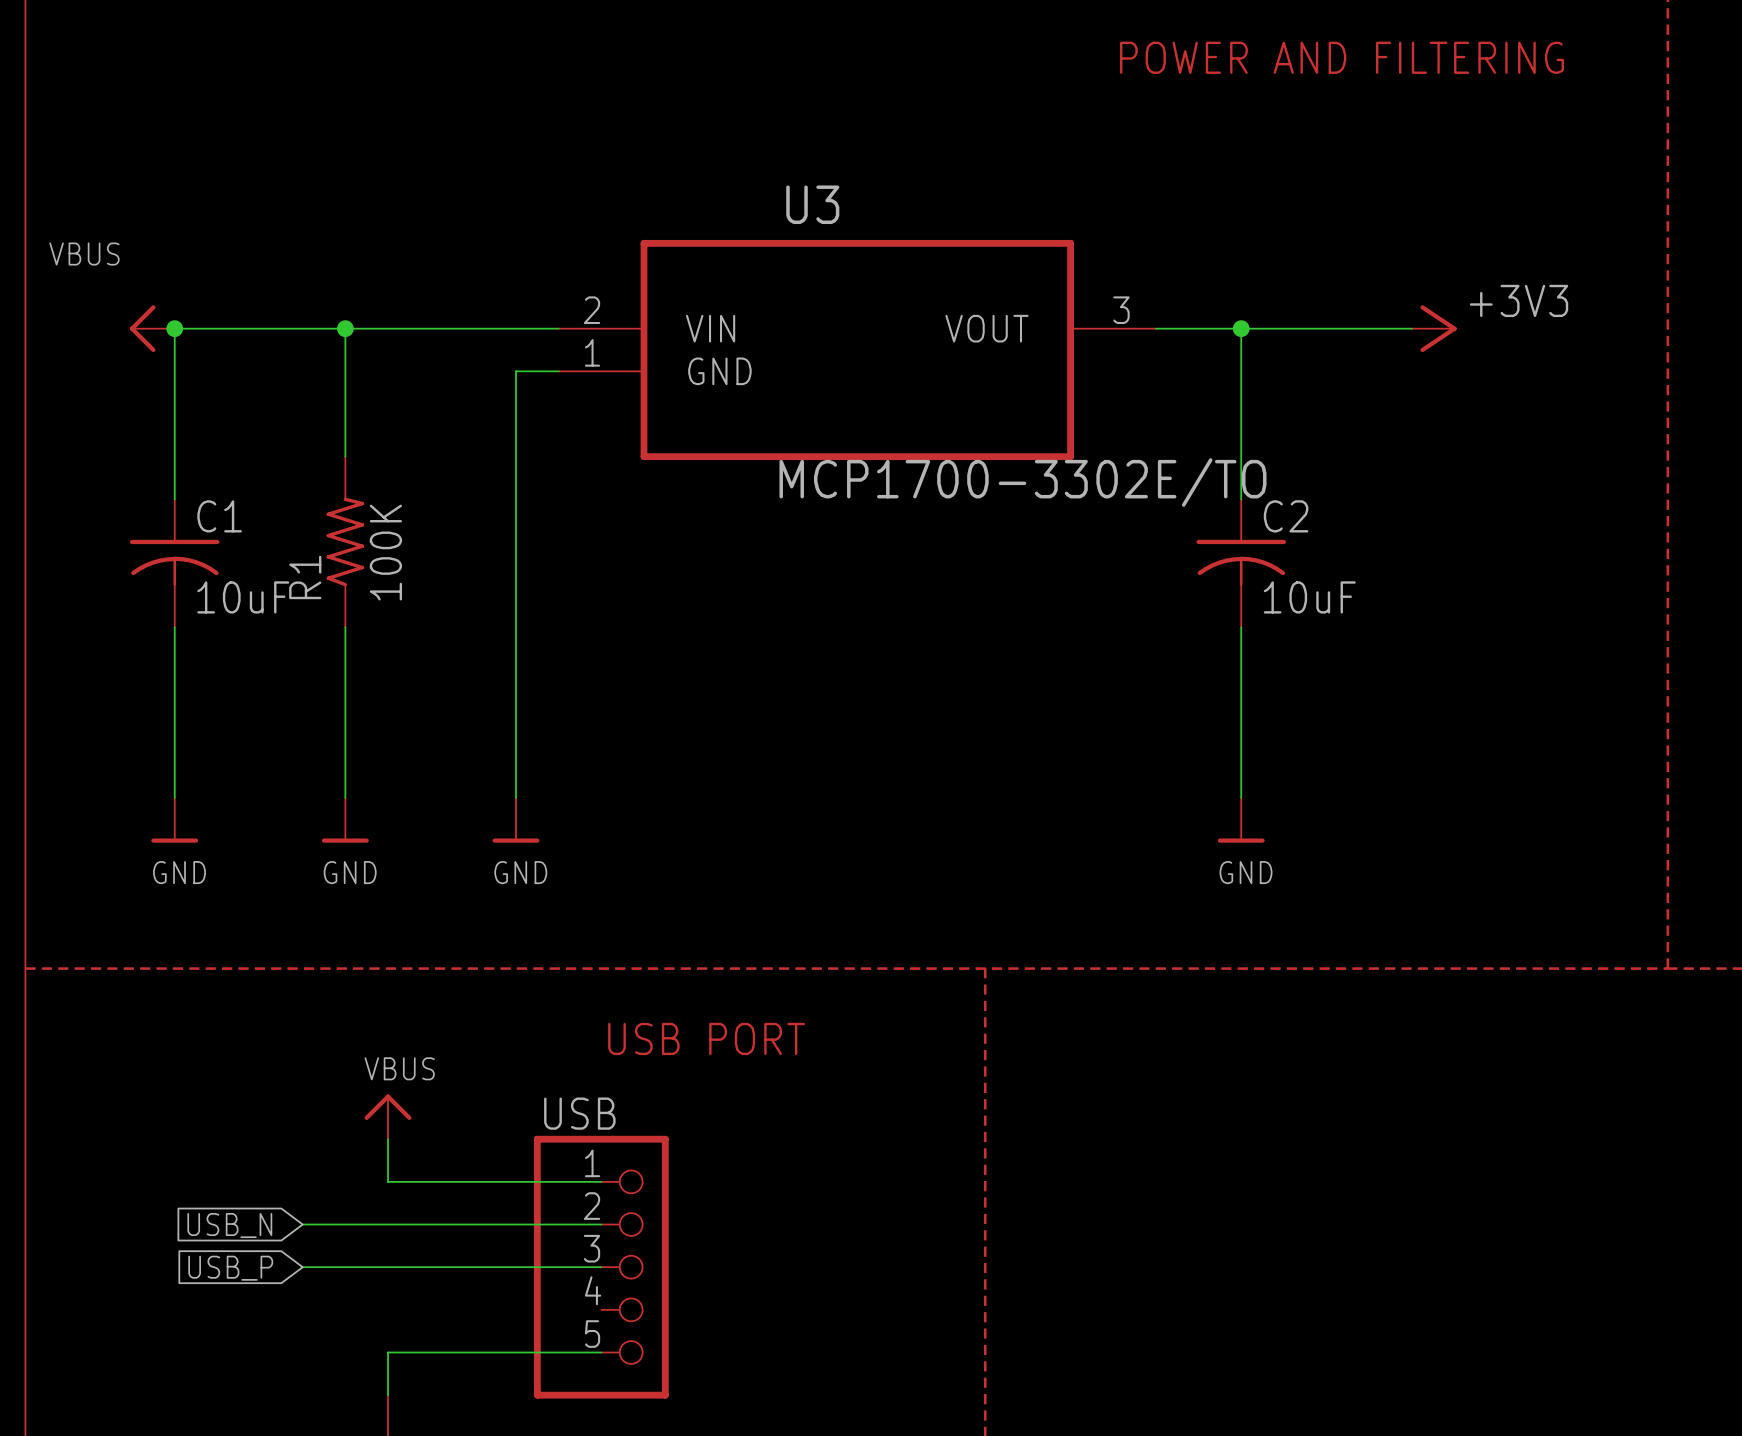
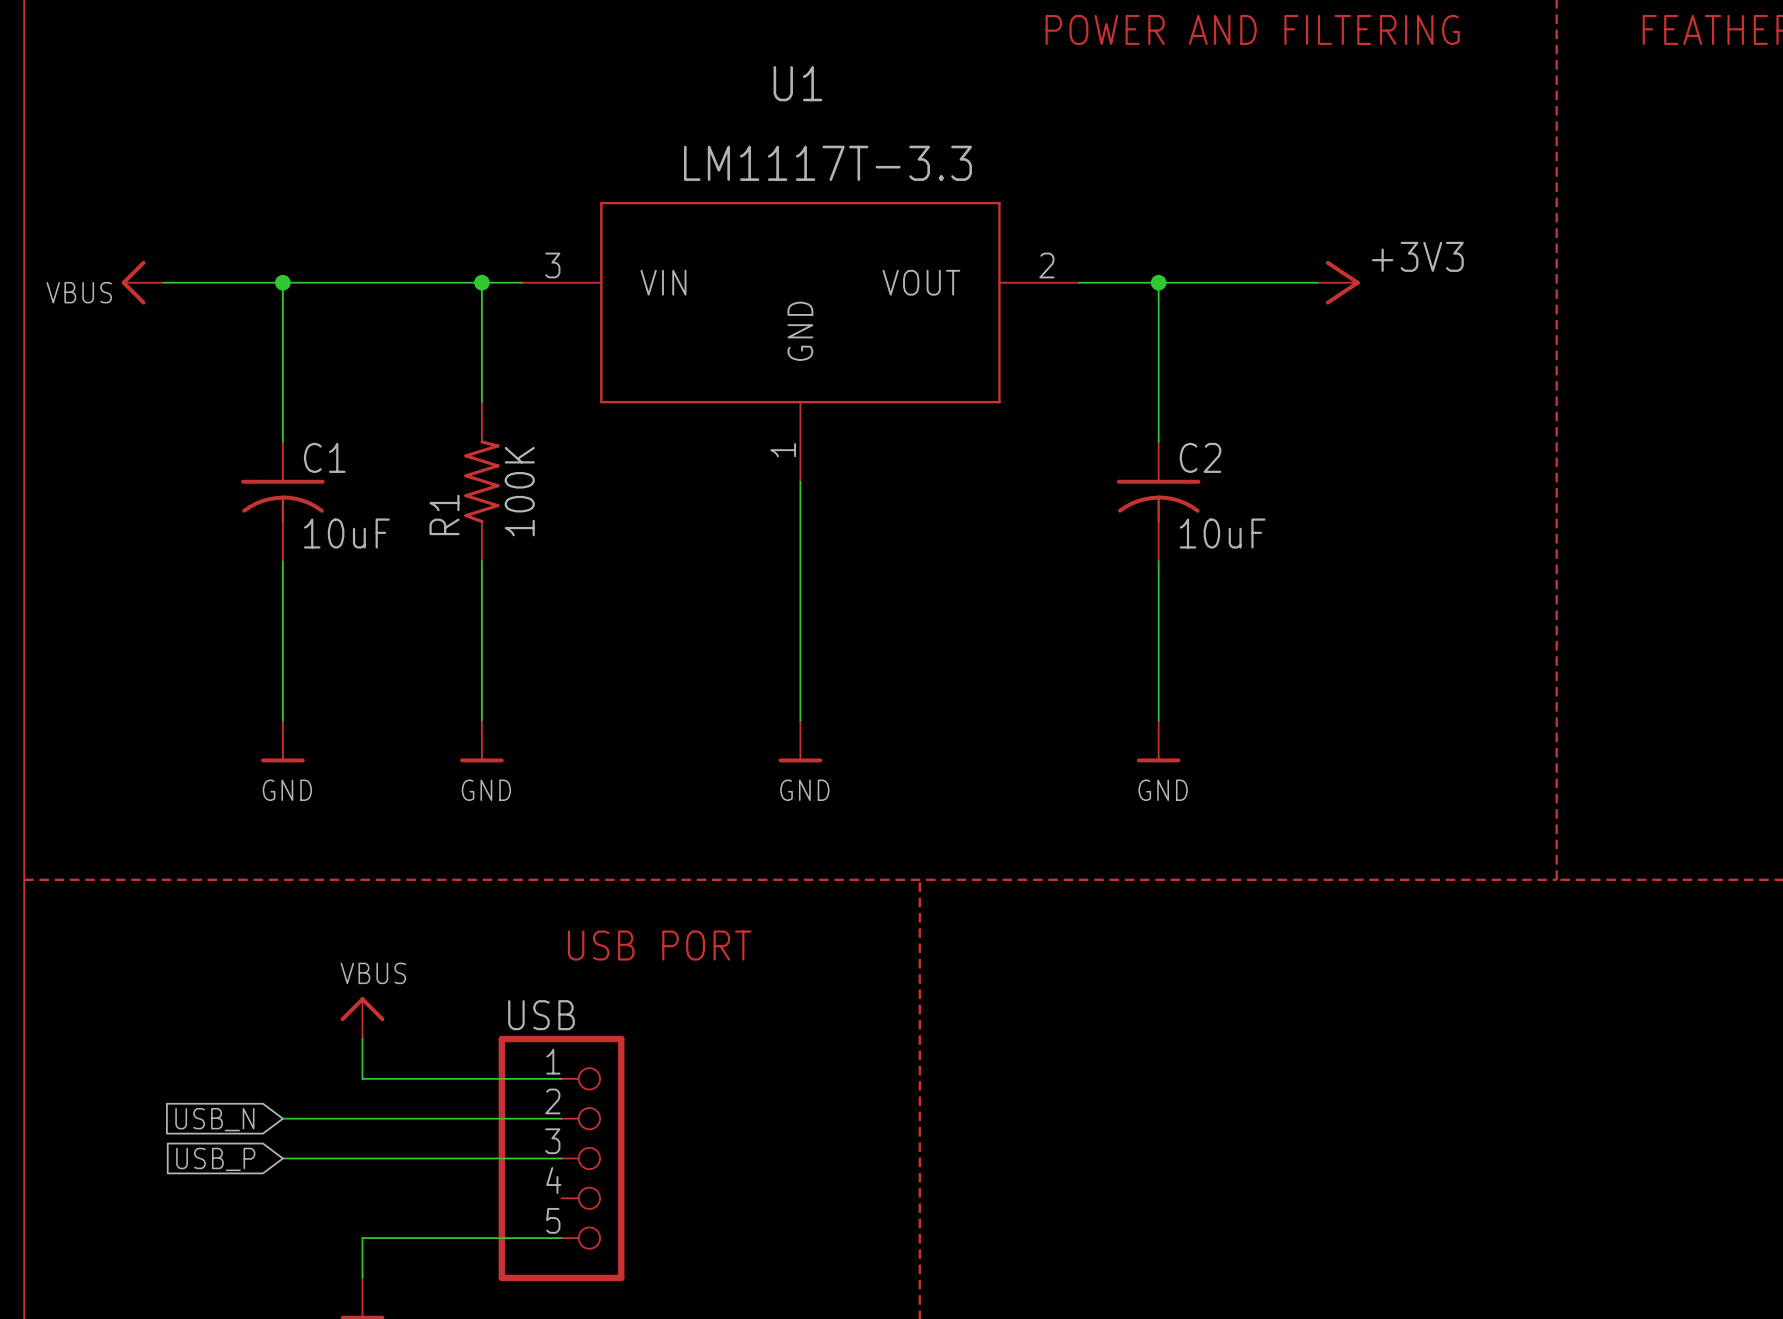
power symbol text position: VBUS (84, 254) -> VBUS (79, 292)
wire: (174, 328) (174, 499) -> (282, 282) (282, 441)
junction: (174, 328) -> none
wire: (345, 328) (345, 456) -> none
junction position: (345, 328) -> (282, 282)
junction: none -> (481, 282)
U3: MCP1700-3302E/TO (857, 350) -> none
wire: (516, 371) (558, 371) -> (481, 322) (481, 282)
U1: none -> LM1117T-3.3 (800, 341)
R1 position: (345, 541) -> (481, 481)
wire: none -> (800, 481) (800, 720)
C1 position: (174, 563) -> (282, 501)
wire: (174, 627) (174, 797) -> (282, 561) (282, 720)
wire: (345, 627) (345, 797) -> none
power symbol: GND (174, 820) -> none
power symbol position: GND (345, 820) -> GND (282, 741)
power symbol: none -> GND (800, 741)

